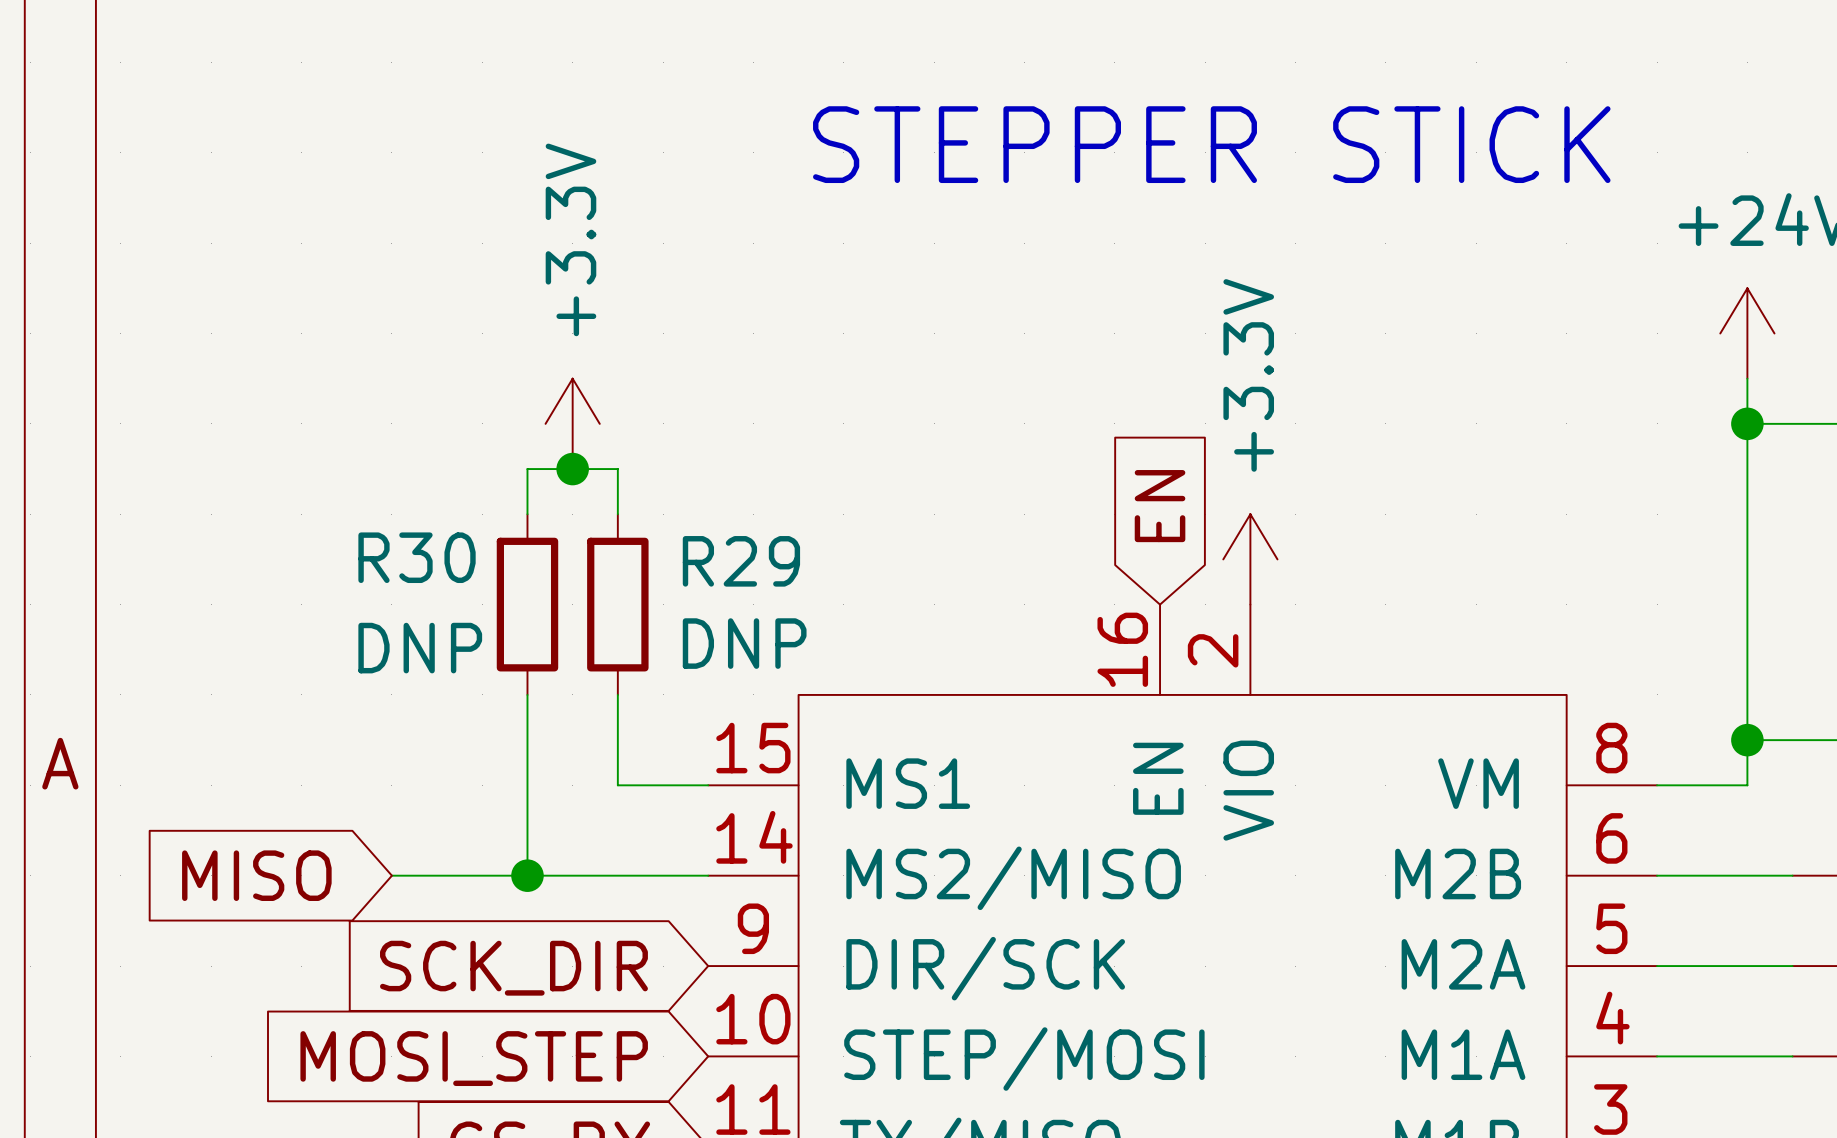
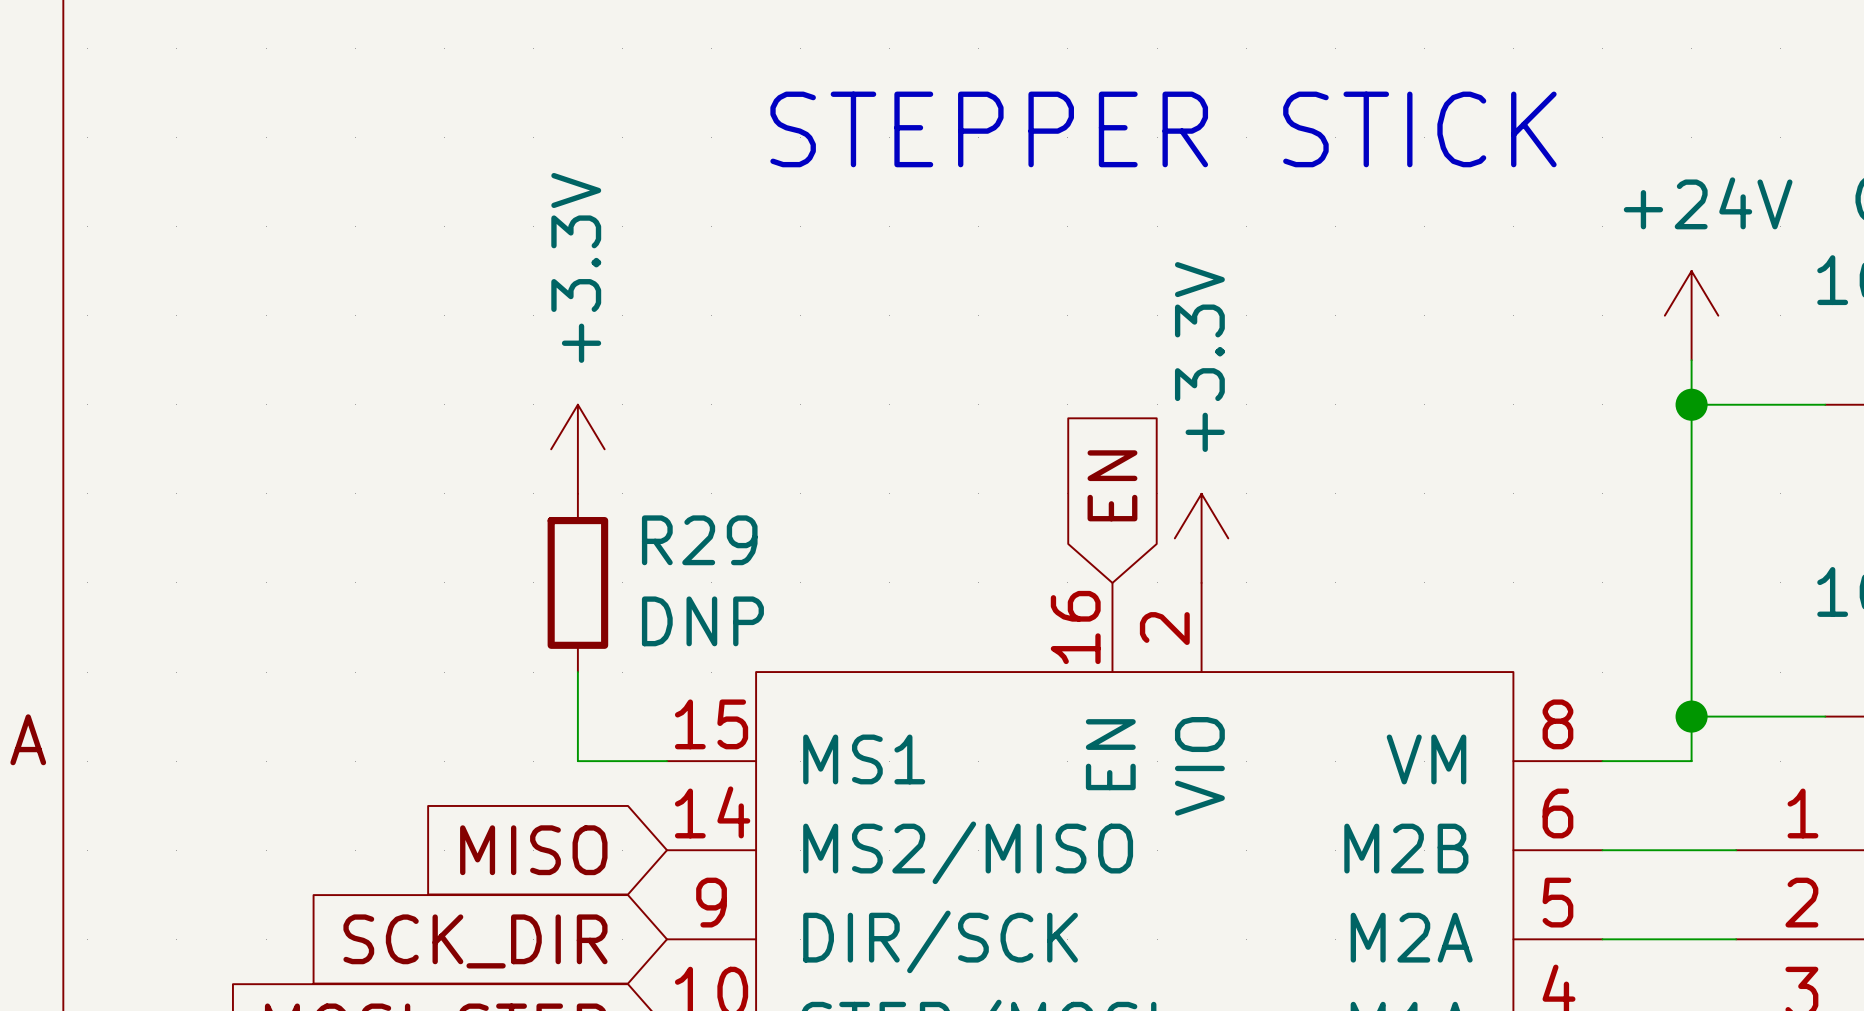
power symbol position: +3.3V (572, 423) -> +3.3V (577, 449)
junction: (572, 469) -> none
wire: (527, 514) (527, 469) (617, 469) (617, 514) -> none
R30: DNP (527, 604) -> none
wire: (527, 694) (527, 875) -> none
global label position: MISO (256, 875) -> MISO (533, 850)
wire: (391, 875) (708, 875) -> none
junction: (527, 875) -> none

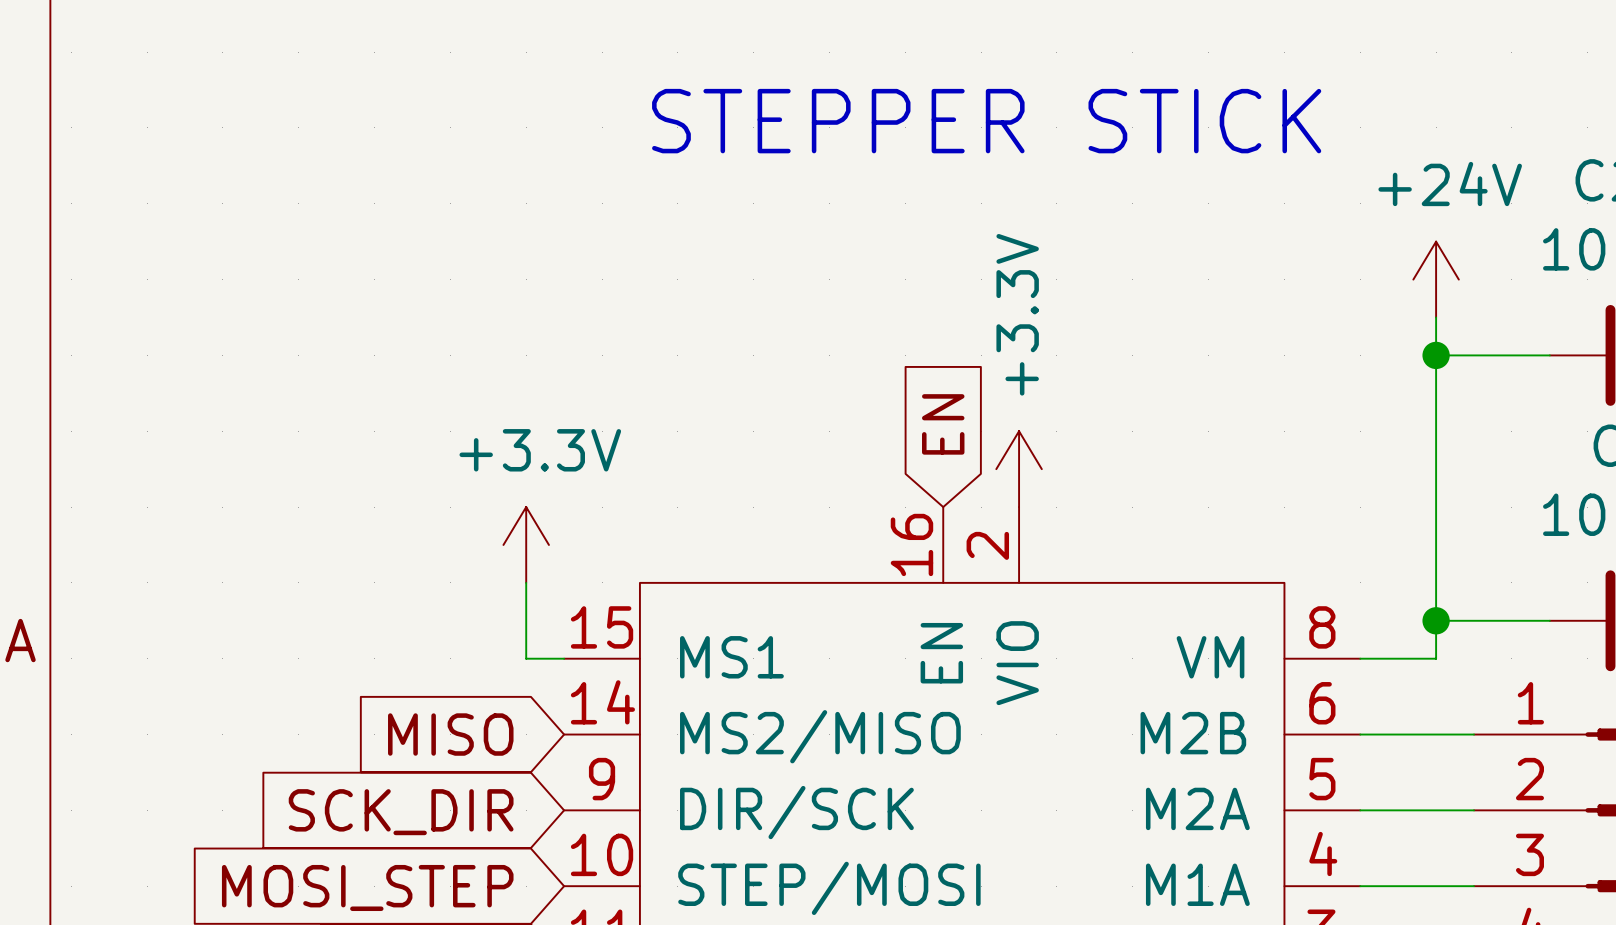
power symbol text rotation: 0° (576, 267) -> 90° clockwise (540, 450)
power symbol position: +3.3V (577, 449) -> +3.3V (526, 544)
R29: DNP (577, 582) -> none
wire: (577, 672) (577, 761) (622, 761) -> (526, 582) (526, 658)

